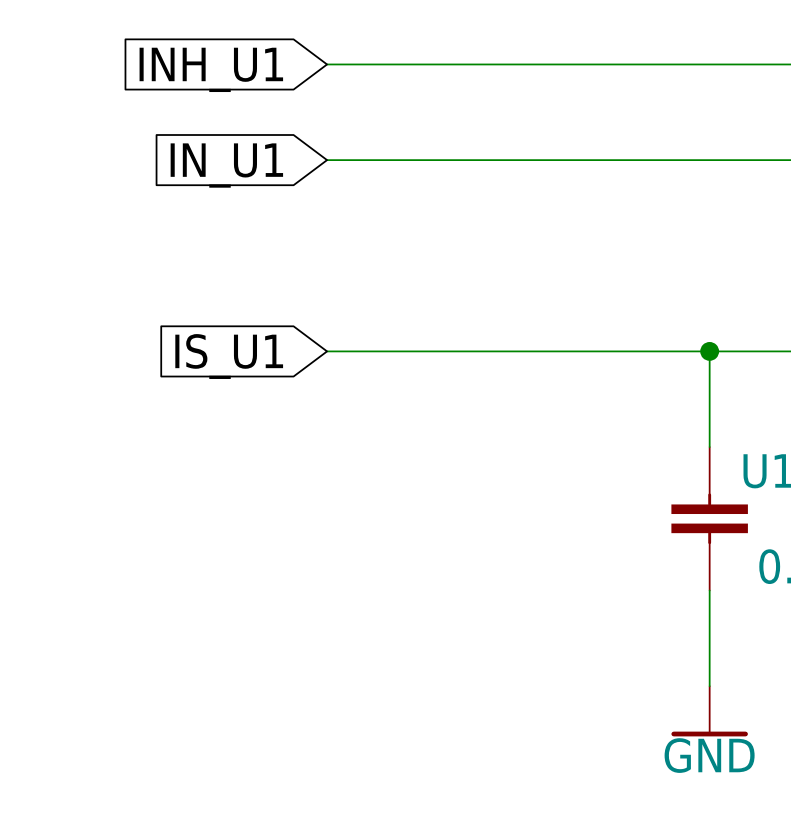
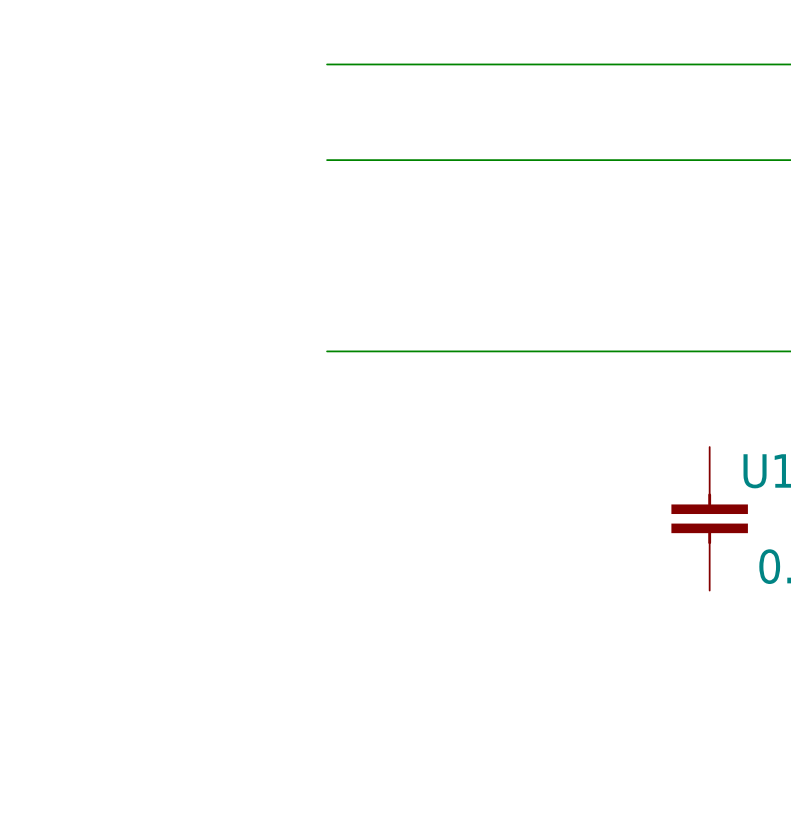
global label: INH_U1 (211, 69) -> none
global label: IN_U1 (226, 165) -> none
wire: (709, 351) (709, 447) -> none
junction: (709, 351) -> none
global label: IS_U1 (229, 356) -> none
wire: (709, 590) (709, 686) -> none
power symbol: GND (709, 711) -> none

